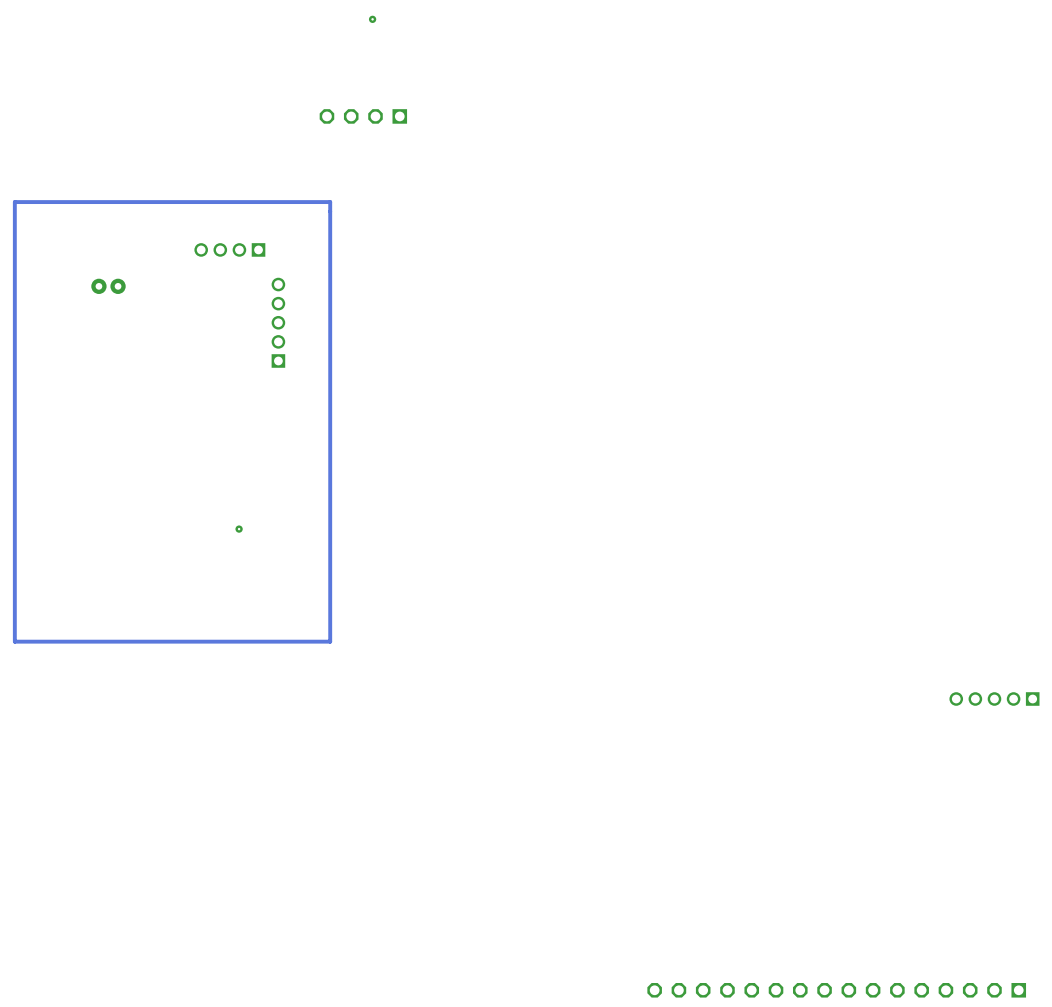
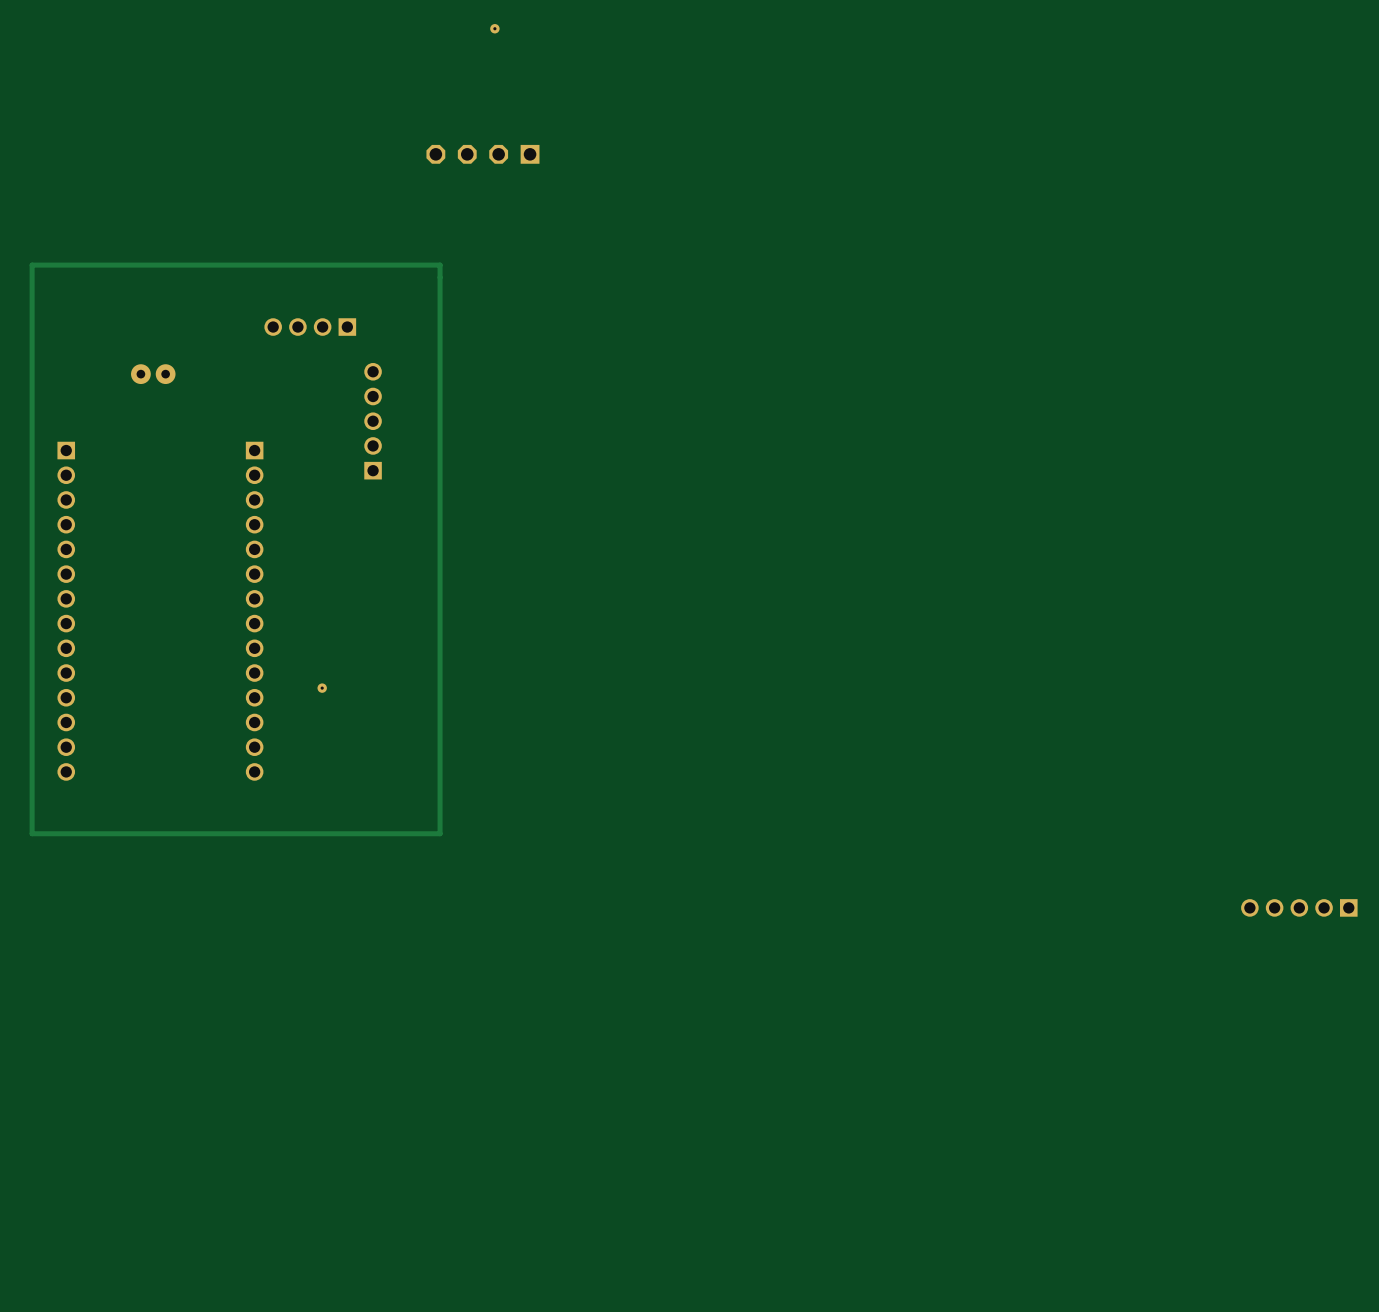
part: none -> (66, 611)
part: none -> (254, 611)
part: (836, 990) -> none

